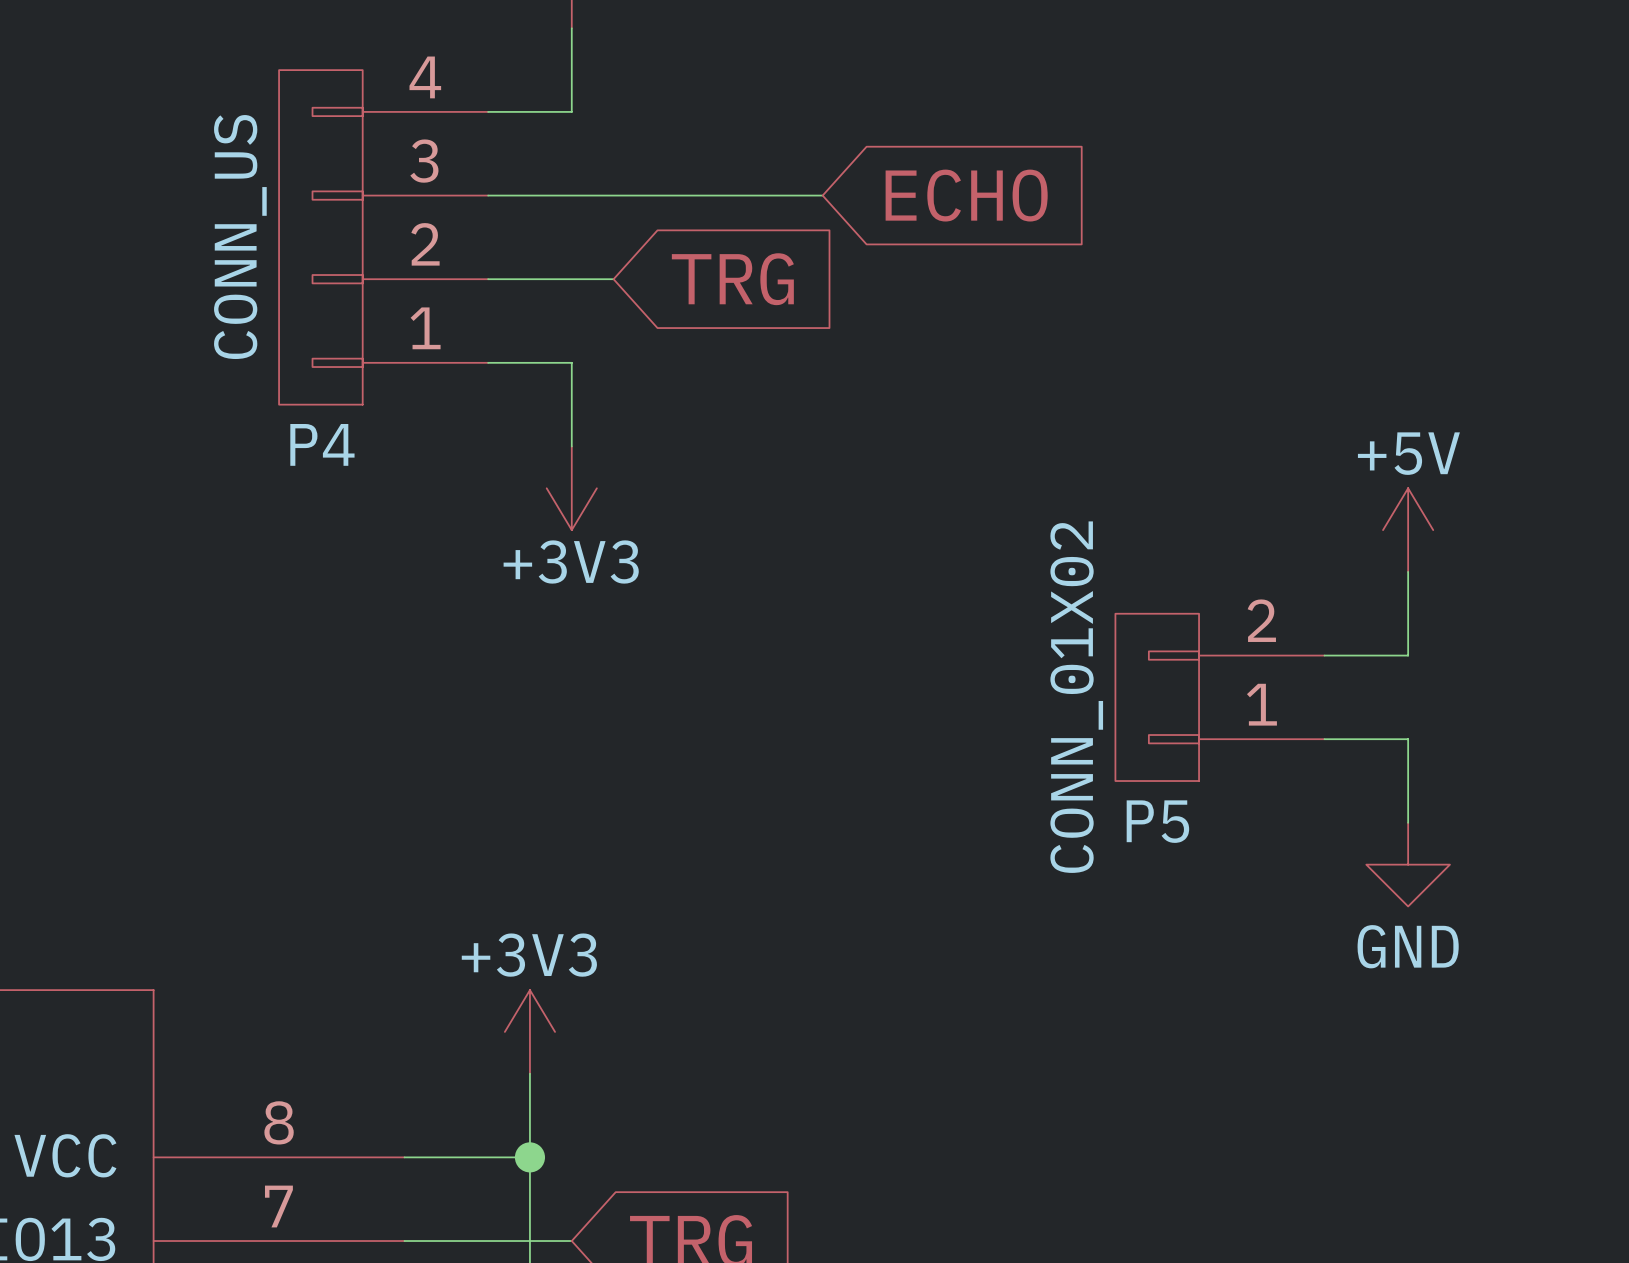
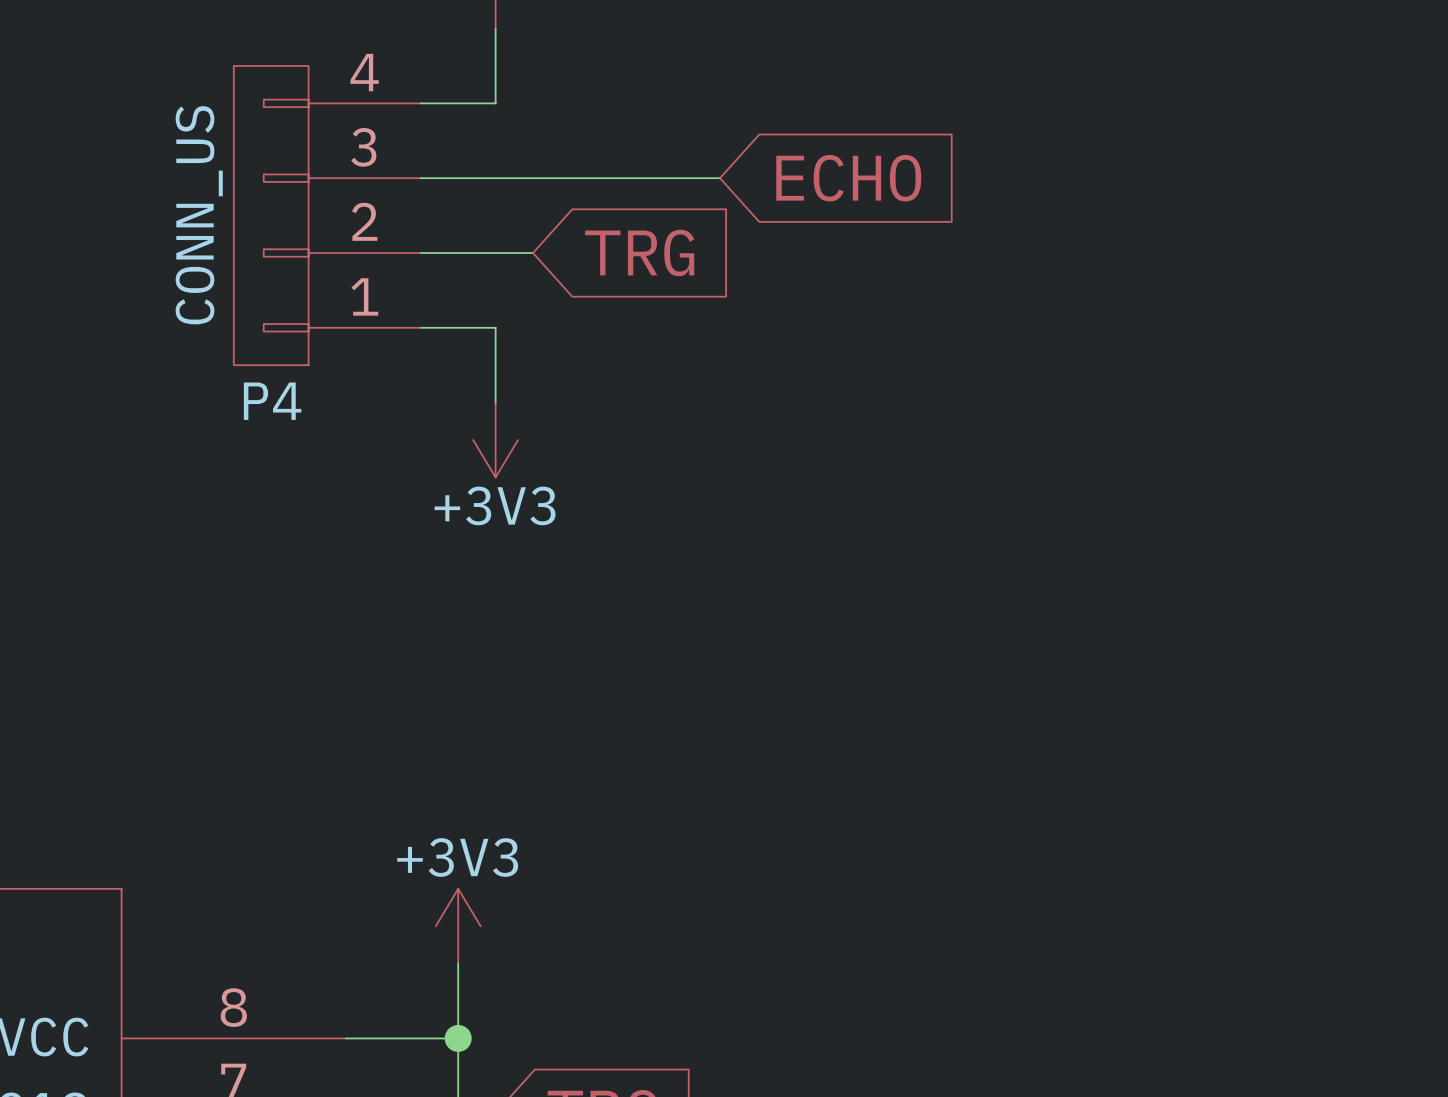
power symbol: +5V (1408, 530) -> none
wire: (1408, 571) (1408, 655) (1324, 655) -> none
P5: CONN_01X02 (1219, 697) -> none
wire: (1324, 739) (1408, 739) (1408, 822) -> none
power symbol: GND (1408, 864) -> none

